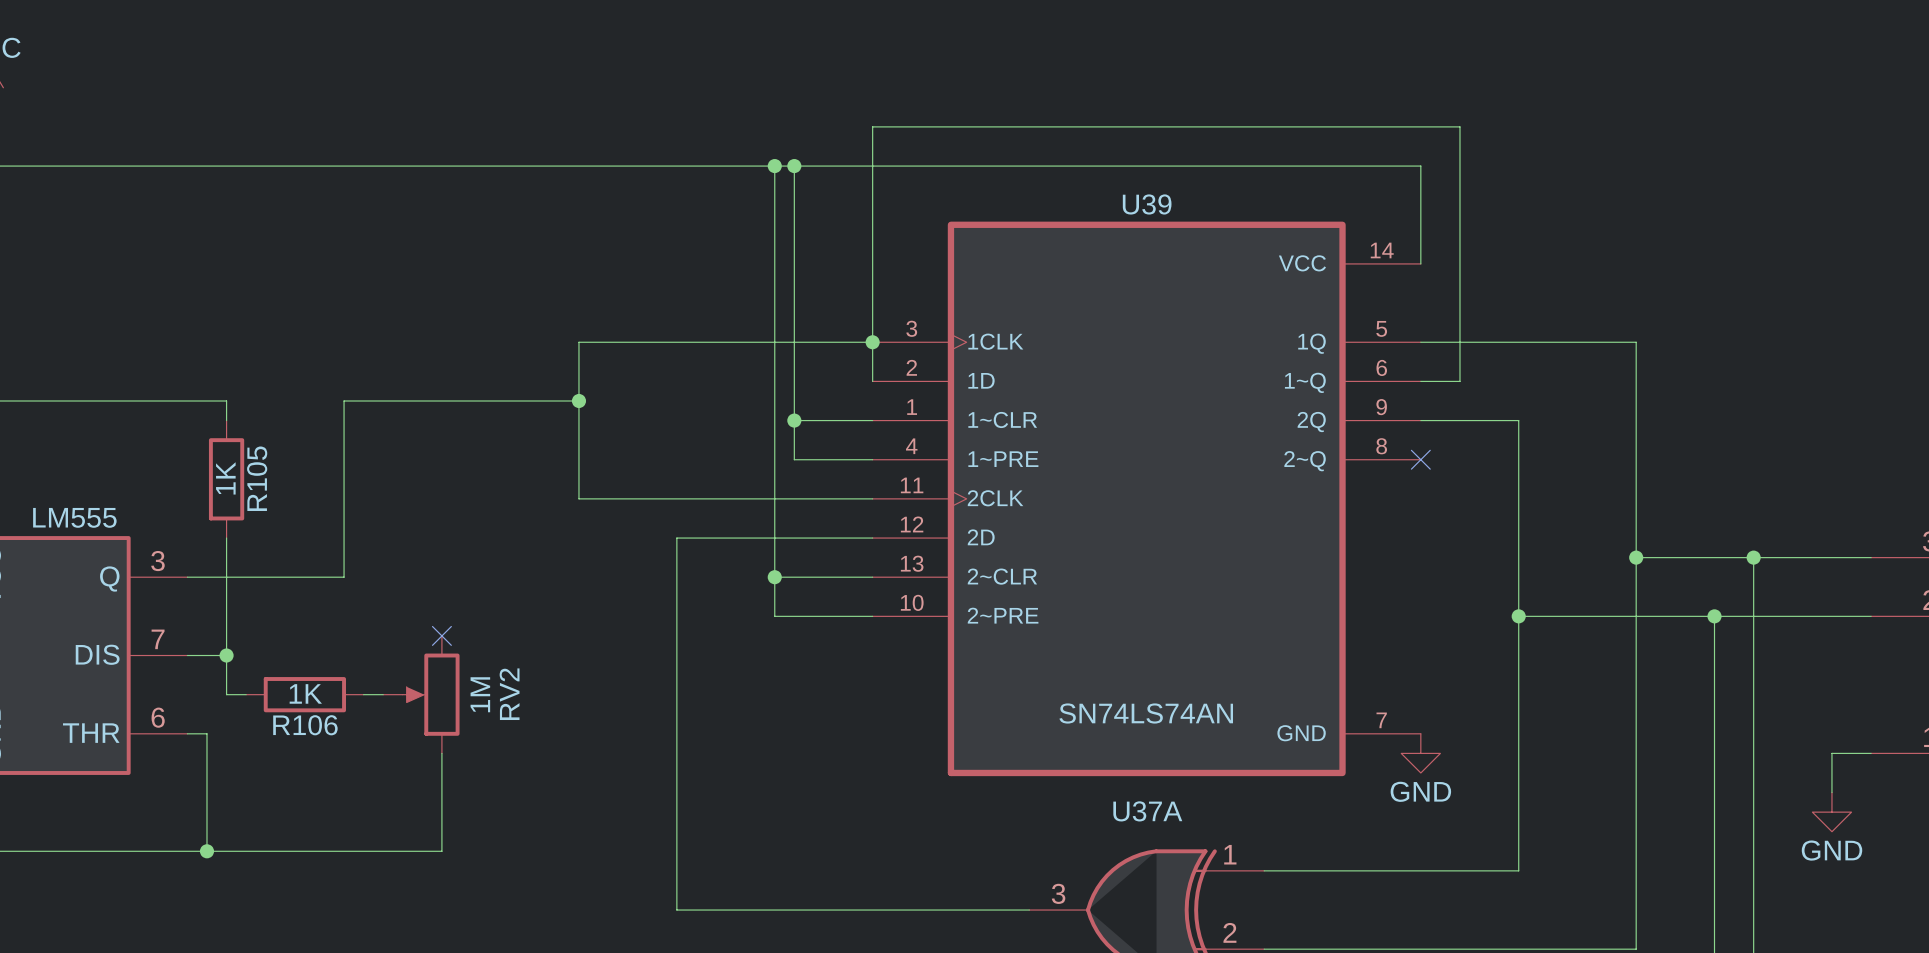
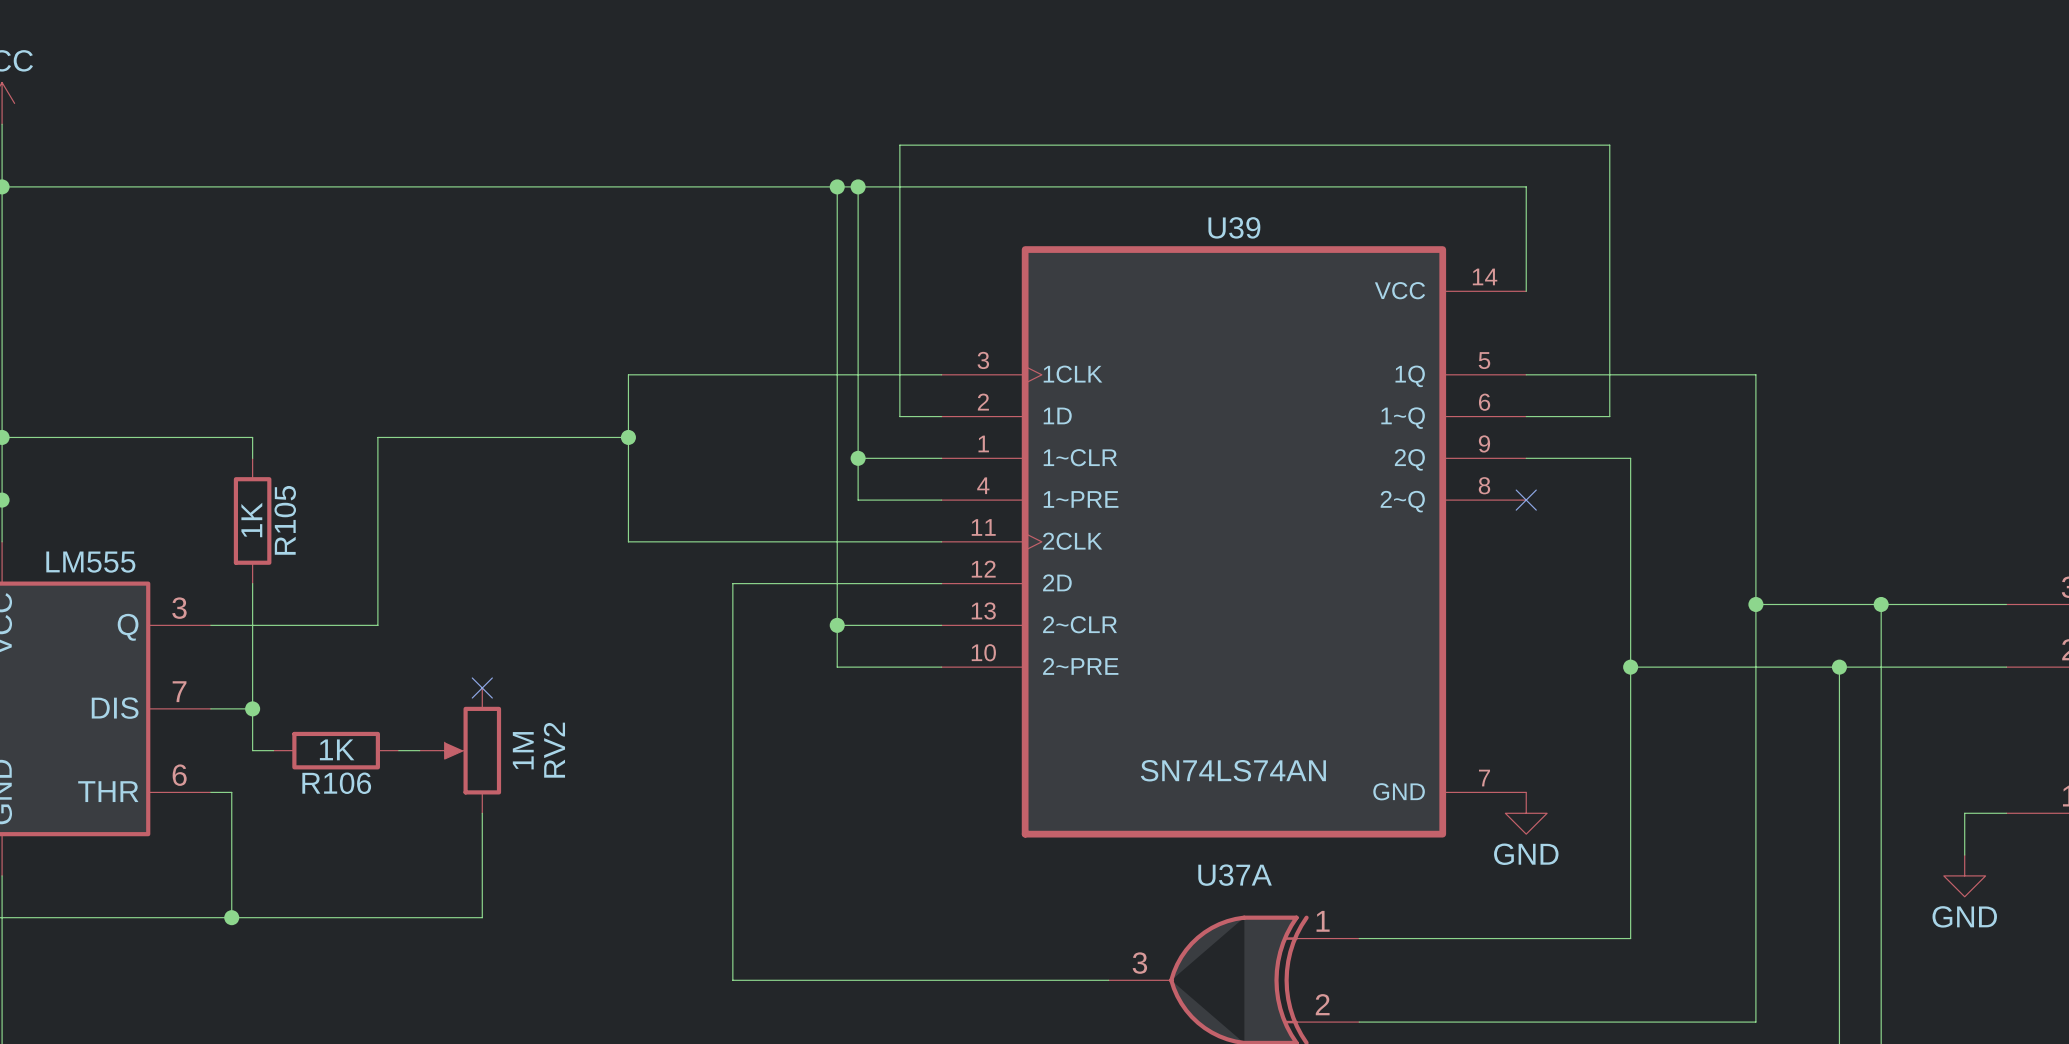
wire: (872, 126) (872, 381) -> (941, 145) (899, 145) (899, 416) (941, 416)
wire: (1459, 126) (1459, 381) -> (1568, 145) (1609, 145) (1609, 416) (1568, 416)
junction: (872, 342) -> none

